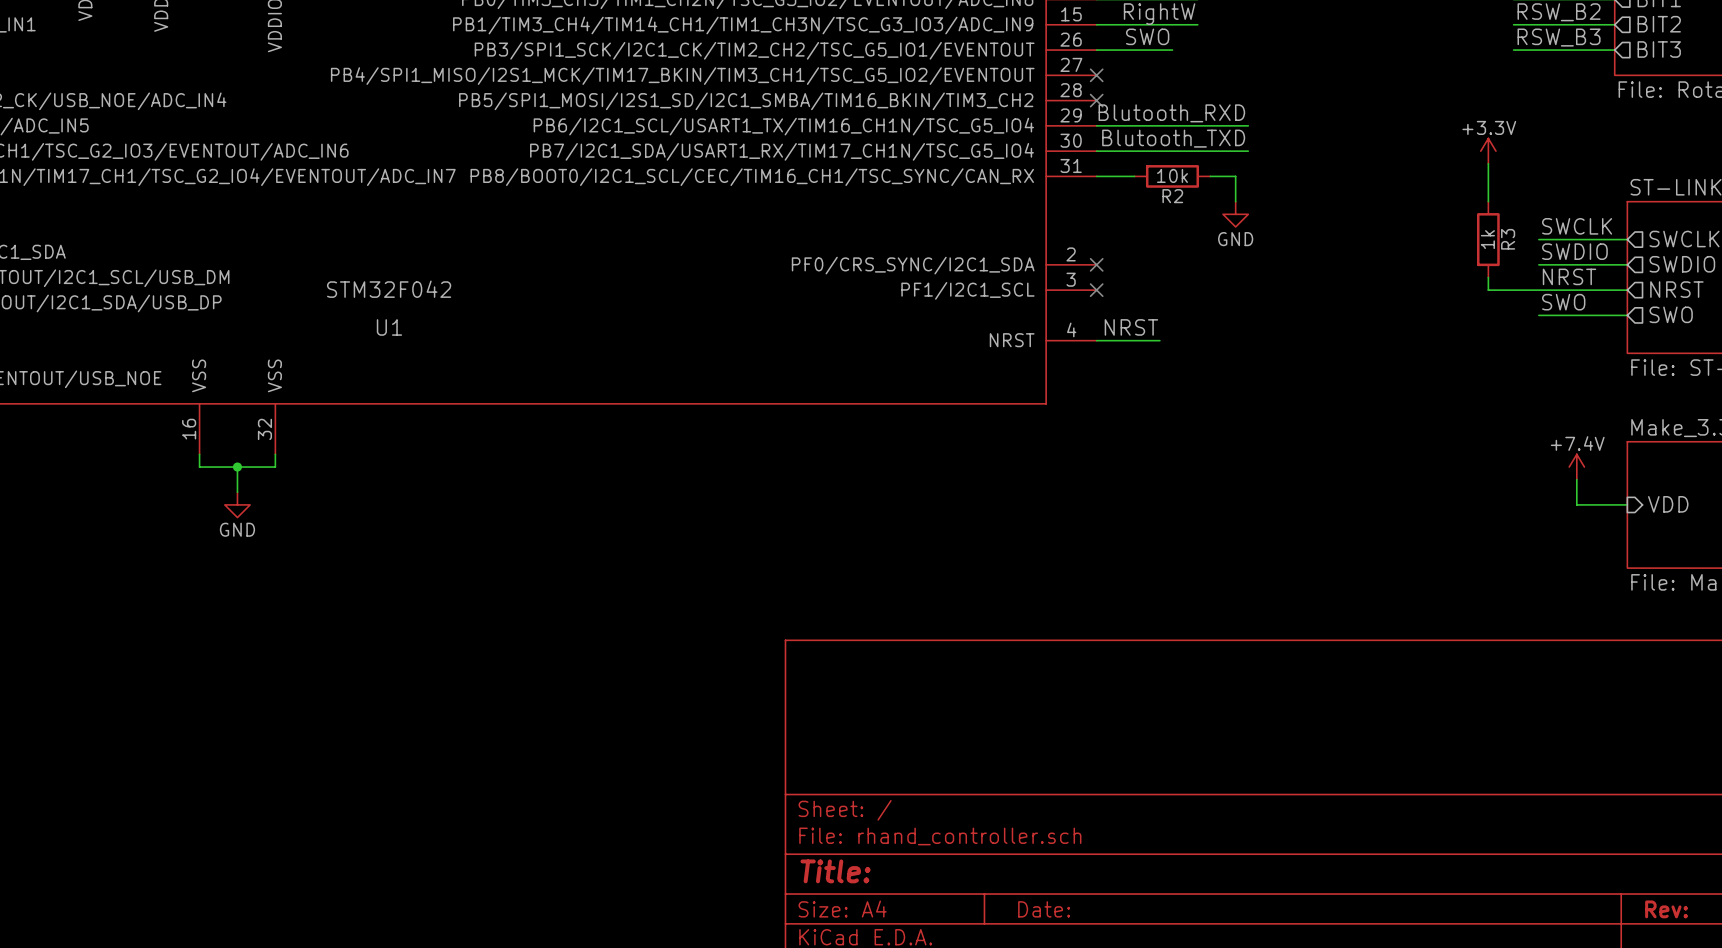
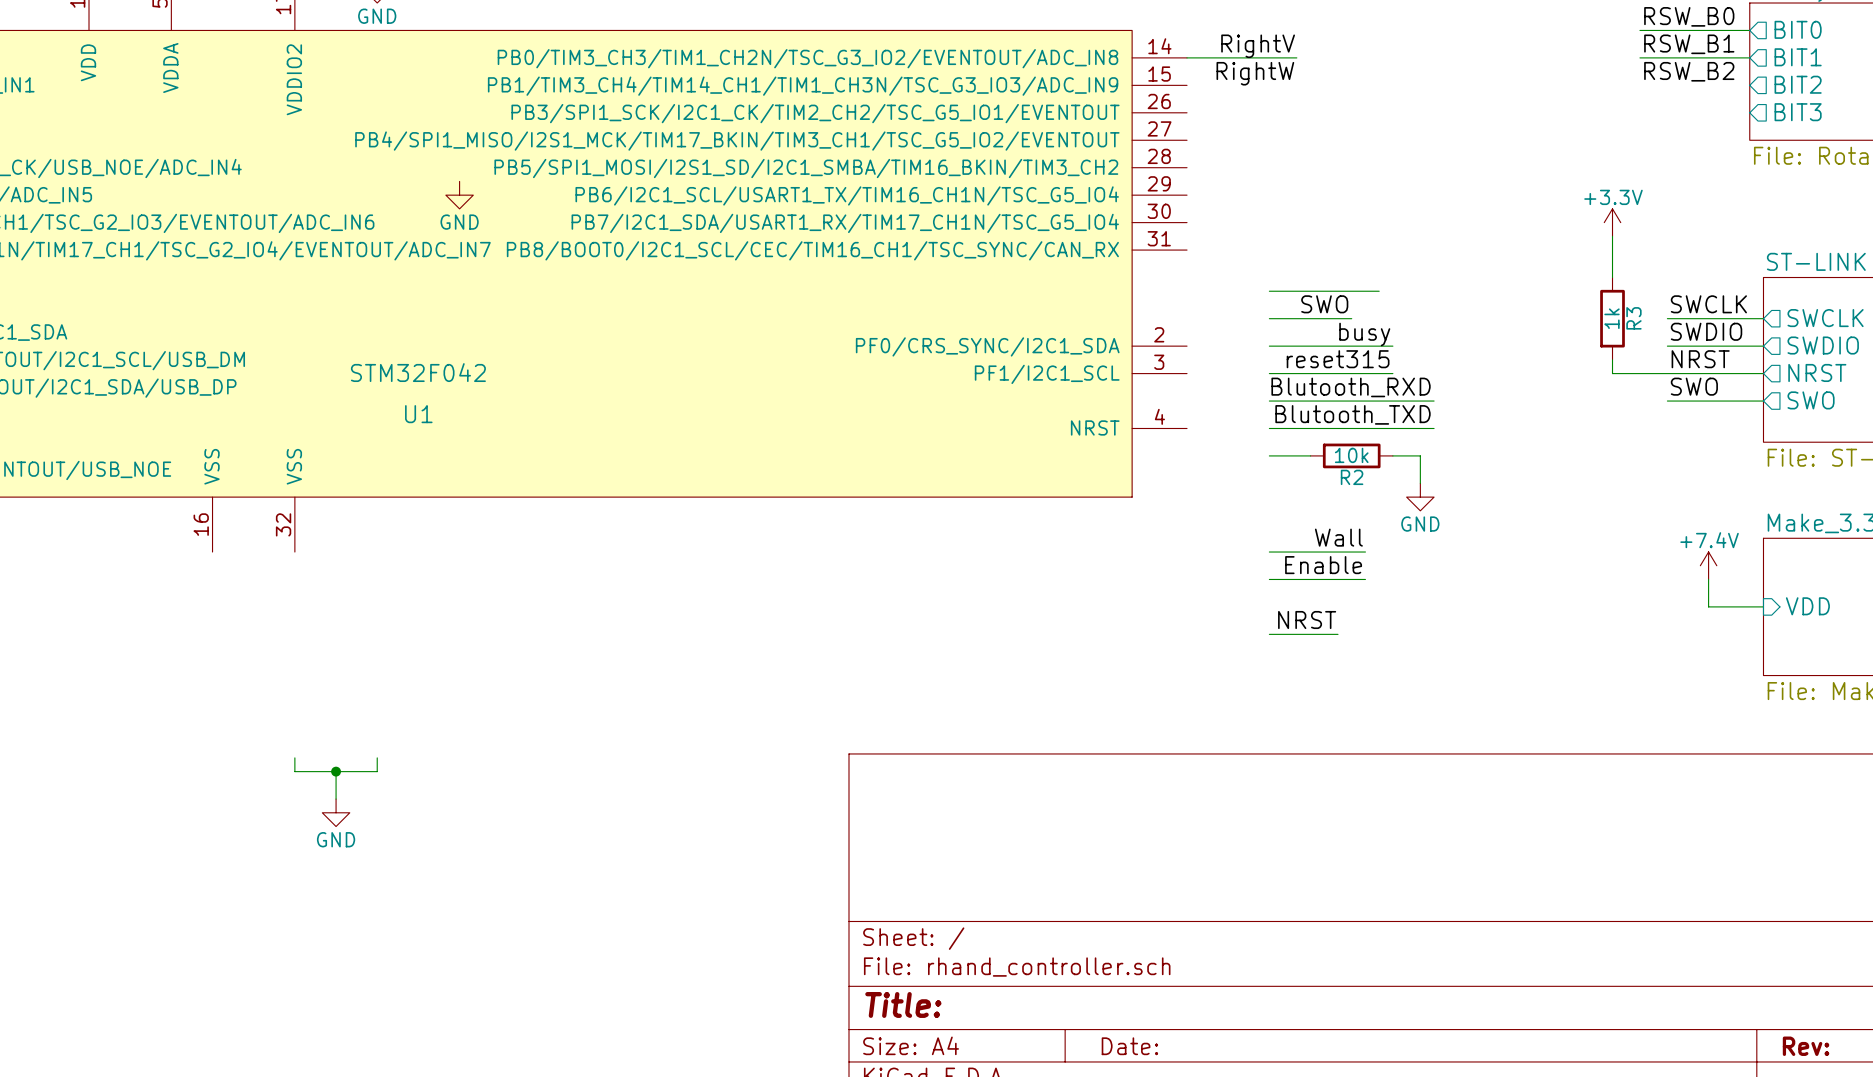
wire: (1096, 24) (1197, 24) -> (1269, 291) (1379, 291)
wire: (1513, 24) (1614, 24) -> none
label position: SWO (1147, 36) -> SWO (1324, 304)
label: RSW_B3 (1559, 37) -> none
wire: (1096, 50) (1172, 50) -> (1269, 318) (1351, 318)
wire: (1513, 50) (1614, 50) -> none
no-connect mark: (1096, 75) -> none
no-connect mark: (1096, 100) -> none
label position: Blutooth_RXD (1171, 113) -> Blutooth_RXD (1351, 387)
power symbol: none -> GND (459, 195)
wire: (1096, 125) (1248, 125) -> (1269, 401) (1434, 401)
label position: Blutooth_TXD (1173, 138) -> Blutooth_TXD (1353, 414)
wire: (1096, 151) (1248, 151) -> (1269, 428) (1434, 428)
wire: (1096, 176) (1134, 176) -> (1269, 455) (1310, 455)
R2 position: (1172, 176) -> (1351, 455)
wire: (1210, 176) (1235, 176) (1235, 201) -> (1392, 455) (1420, 455) (1420, 483)
power symbol position: GND (1235, 214) -> GND (1420, 497)
label: none -> busy (1364, 334)
no-connect mark: (1096, 264) -> none
wire: none -> (1269, 346) (1392, 346)
label: none -> reset315 (1338, 359)
no-connect mark: (1096, 290) -> none
wire: none -> (1269, 373) (1392, 373)
label position: NRST (1131, 327) -> NRST (1307, 620)
wire: (1096, 340) (1159, 340) -> (1269, 634) (1338, 634)
label: none -> Wall (1338, 537)
wire: (199, 454) (199, 467) (275, 467) (275, 454) -> (294, 757) (294, 771) (377, 771) (377, 757)
wire: none -> (1269, 552) (1365, 552)
label: none -> Enable (1323, 565)
wire: (237, 467) (237, 492) -> (336, 771) (336, 799)
junction: (237, 467) -> none
wire: none -> (1269, 579) (1365, 579)
power symbol position: GND (237, 504) -> GND (336, 812)
junction: none -> (336, 771)

